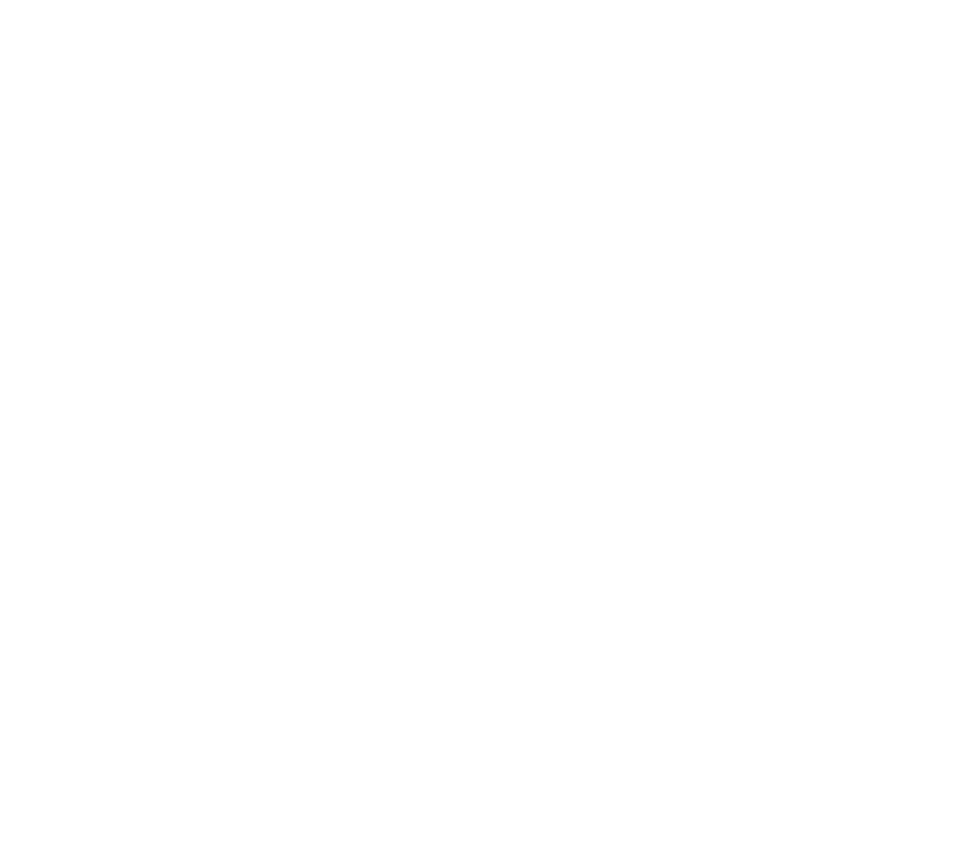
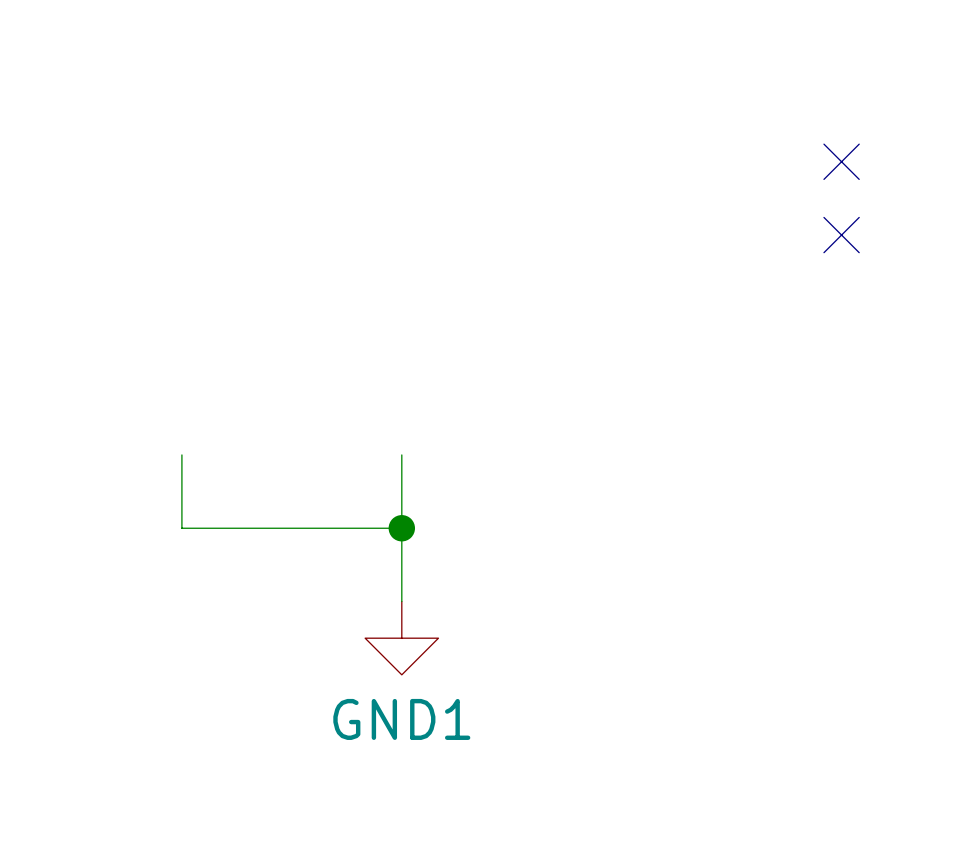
no-connect mark: none -> (841, 161)
no-connect mark: none -> (841, 235)
wire: none -> (181, 454) (181, 528) (401, 528)
wire: none -> (401, 454) (401, 601)
junction: none -> (401, 528)
power symbol: none -> GND1 (401, 638)

